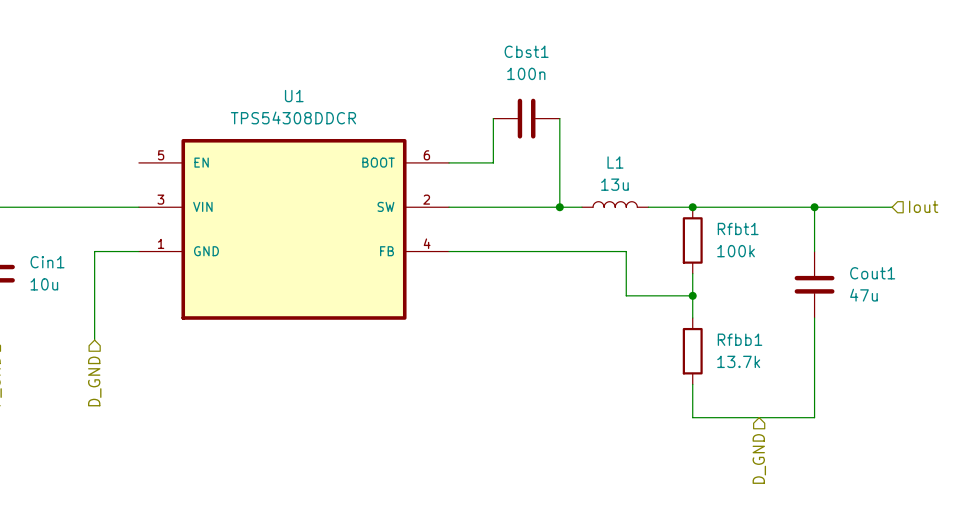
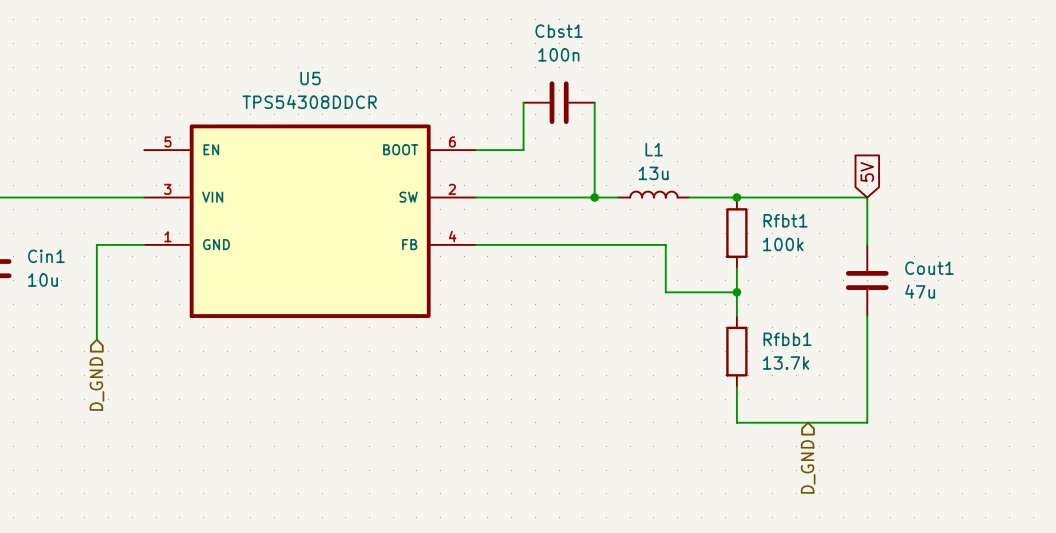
U1 name: U1 (294, 96) -> U5 (310, 78)
global label: none -> 5V (867, 171)
hierarchical label: Iout (923, 206) -> none
wire: (814, 207) (892, 207) -> none
junction: (814, 207) -> none

